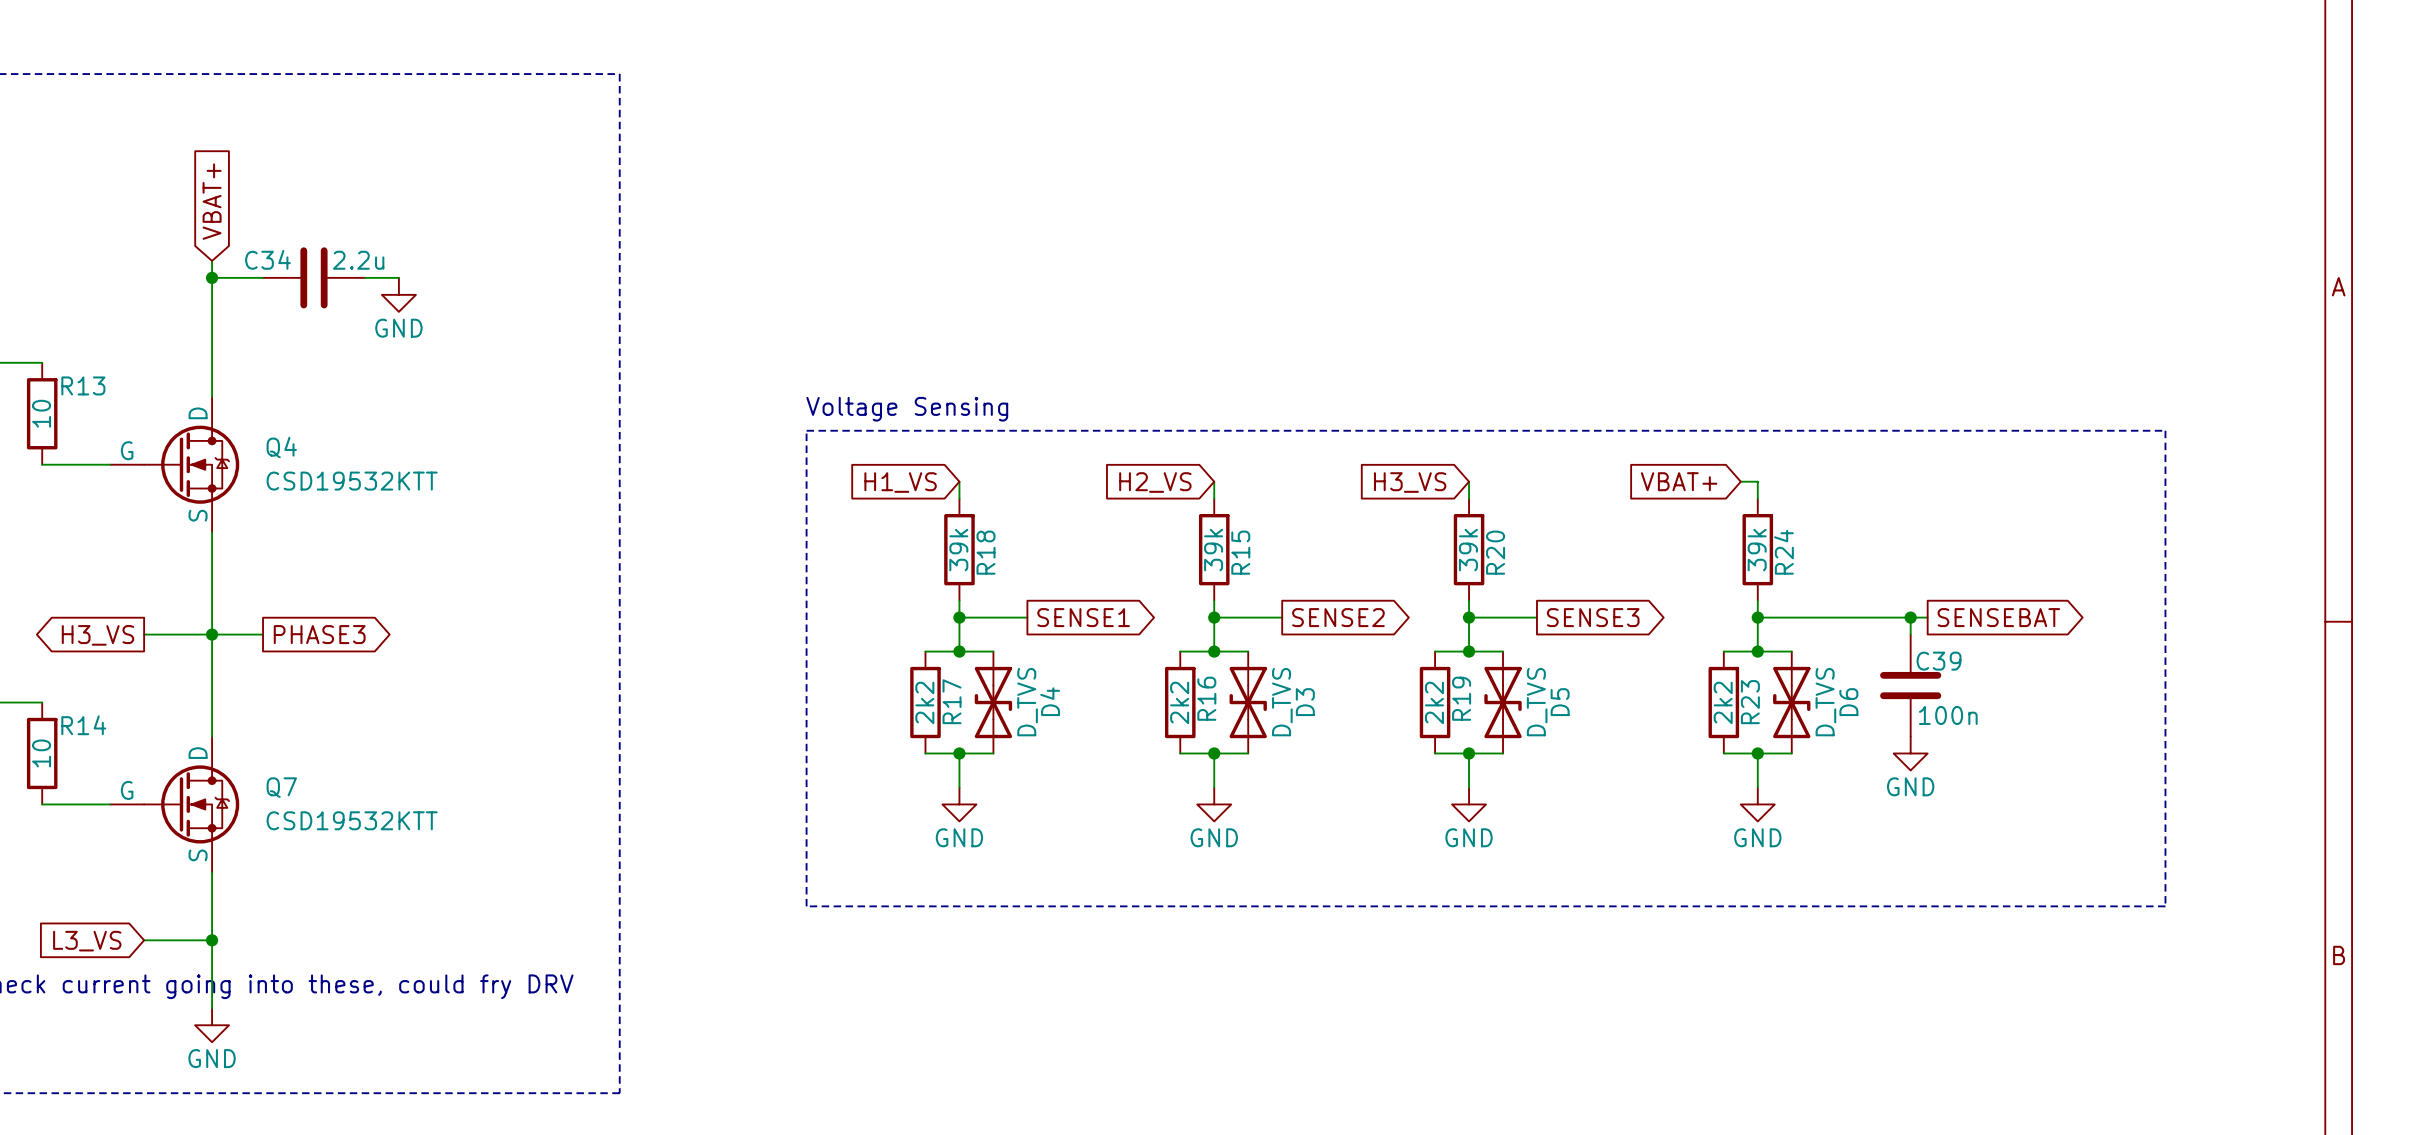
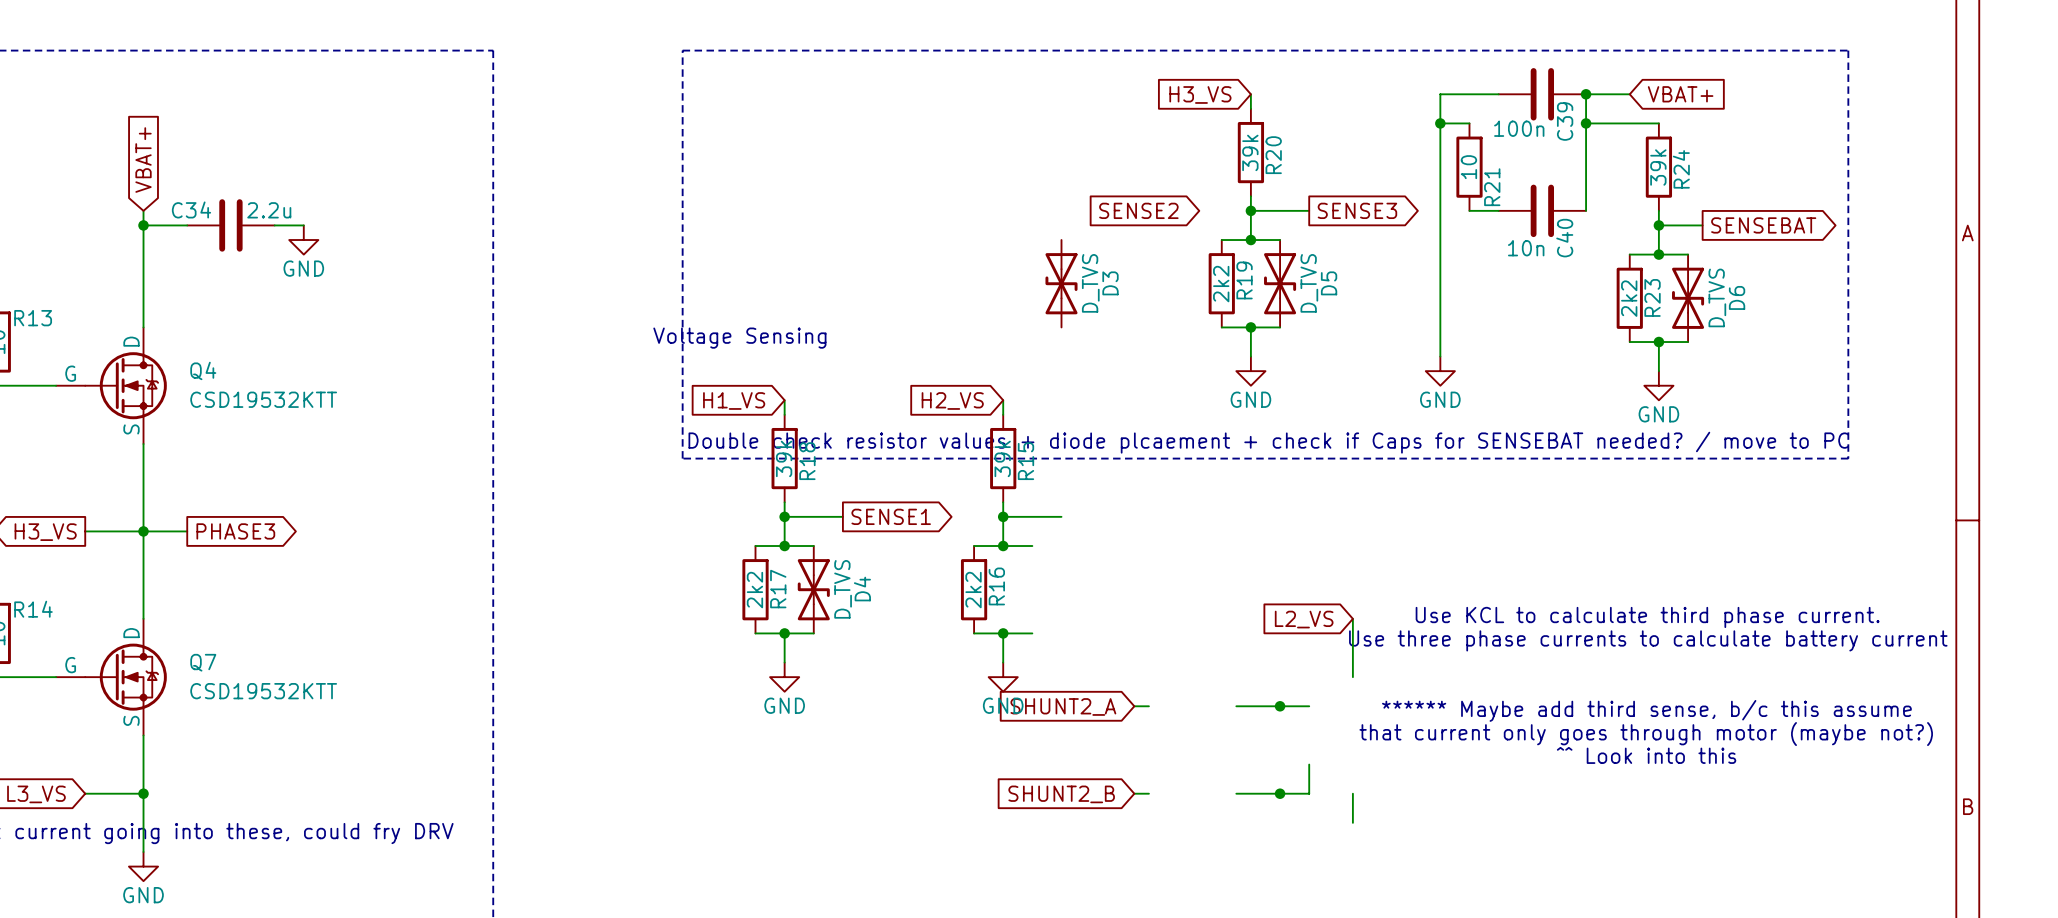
line: none -> (682, 50) (1848, 50) (1848, 458) (682, 458) (682, 50)
global label: none -> H3_VS (1200, 94)
wire: none -> (1250, 94) (1250, 108)
wire: none -> (1498, 94) (1440, 94) (1440, 356)
junction: none -> (1586, 94)
wire: none -> (1629, 94) (1586, 94) (1586, 210)
global label: none -> VBAT+ (1680, 94)
wire: none -> (1440, 123) (1469, 123)
junction: none -> (1440, 123)
wire: none -> (1586, 123) (1658, 123)
junction: none -> (1586, 123)
R21: none -> 10 (1469, 167)
wire: none -> (1250, 196) (1250, 240)
global label: none -> SENSE2 (1138, 210)
wire: none -> (1250, 210) (1309, 210)
junction: none -> (1250, 210)
global label: none -> SENSE3 (1357, 210)
wire: none -> (1469, 210) (1498, 210)
C40: none -> 10n (1542, 210)
wire: none -> (1658, 210) (1658, 254)
wire: none -> (1658, 225) (1702, 225)
junction: none -> (1658, 225)
global label: none -> SENSEBAT (1763, 225)
wire: none -> (1221, 240) (1280, 240)
junction: none -> (1250, 240)
wire: none -> (1629, 254) (1688, 254)
junction: none -> (1658, 254)
wire: none -> (1250, 327) (1250, 356)
junction: none -> (1250, 327)
wire: none -> (1658, 342) (1658, 371)
junction: none -> (1658, 342)
line: (806, 430) (2165, 430) (2165, 906) (806, 906) (806, 430) -> none
power symbol: none -> GND (1250, 371)
power symbol: none -> GND (1440, 371)
power symbol: none -> GND (1658, 385)
wire: (1469, 481) (1469, 498) -> none
global label: VBAT+ (1679, 481) -> none
wire: (1740, 481) (1757, 481) (1757, 498) -> none
global label: H3_VS (1410, 482) -> none
text: none -> Double check resistor values + diode plcaement + check if Caps for SENSEBAT needed? / move to PC (1268, 442)
R20 position: (1469, 549) -> (1250, 152)
R24 position: (1757, 549) -> (1658, 167)
wire: (1469, 600) (1469, 651) -> none
wire: (1757, 600) (1757, 651) -> none
global label: SENSE2 (1338, 617) -> none
wire: (1469, 617) (1536, 617) -> (1221, 327) (1280, 327)
junction: (1469, 617) -> none
global label: SENSE3 (1593, 617) -> none
wire: (1757, 617) (1927, 617) -> none
junction: (1757, 617) -> none
wire: (1910, 617) (1910, 634) -> none
junction: (1910, 617) -> none
global label: SENSEBAT (1998, 617) -> none
wire: (1435, 651) (1503, 651) -> none
junction: (1469, 651) -> none
wire: (1723, 651) (1791, 651) -> (1629, 342) (1688, 342)
junction: (1757, 651) -> none
C39 rotation: 0° (1910, 685) -> 90° clockwise (1542, 94)
C39 position: (1910, 685) -> (1542, 94)
D3 position: (1248, 702) -> (1061, 283)
R19 position: (1435, 702) -> (1221, 283)
D5 position: (1503, 702) -> (1280, 283)
R23 position: (1723, 702) -> (1629, 298)
D6 position: (1791, 702) -> (1688, 298)
text: none -> Use KCL to calculate third phase current. (1647, 617)
wire: none -> (1352, 618) (1352, 677)
global label: none -> L2_VS (1304, 619)
wire: (1435, 753) (1503, 753) -> none
wire: (1469, 753) (1469, 787) -> none
junction: (1469, 753) -> none
wire: (1723, 753) (1791, 753) -> none
wire: (1757, 753) (1757, 787) -> (1352, 793) (1352, 822)
junction: (1757, 753) -> none
power symbol: GND (1910, 753) -> none
text: none -> Use three phase currents to calculate battery current (1648, 640)
power symbol: GND (1469, 804) -> none
power symbol: GND (1757, 804) -> none
wire: none -> (1134, 706) (1148, 706)
wire: none -> (1236, 706) (1309, 706)
junction: none -> (1280, 706)
global label: none -> SHUNT2_A (1063, 706)
text: none -> ****** Maybe add third sense, b/c this assume (1646, 710)
text: none -> that current only goes through motor (maybe not?) (1646, 734)
text: none -> ^^ Look into this (1646, 755)
wire: none -> (1309, 764) (1309, 793) (1236, 793)
wire: none -> (1134, 793) (1148, 793)
junction: none -> (1280, 793)
global label: none -> SHUNT2_B (1061, 794)

